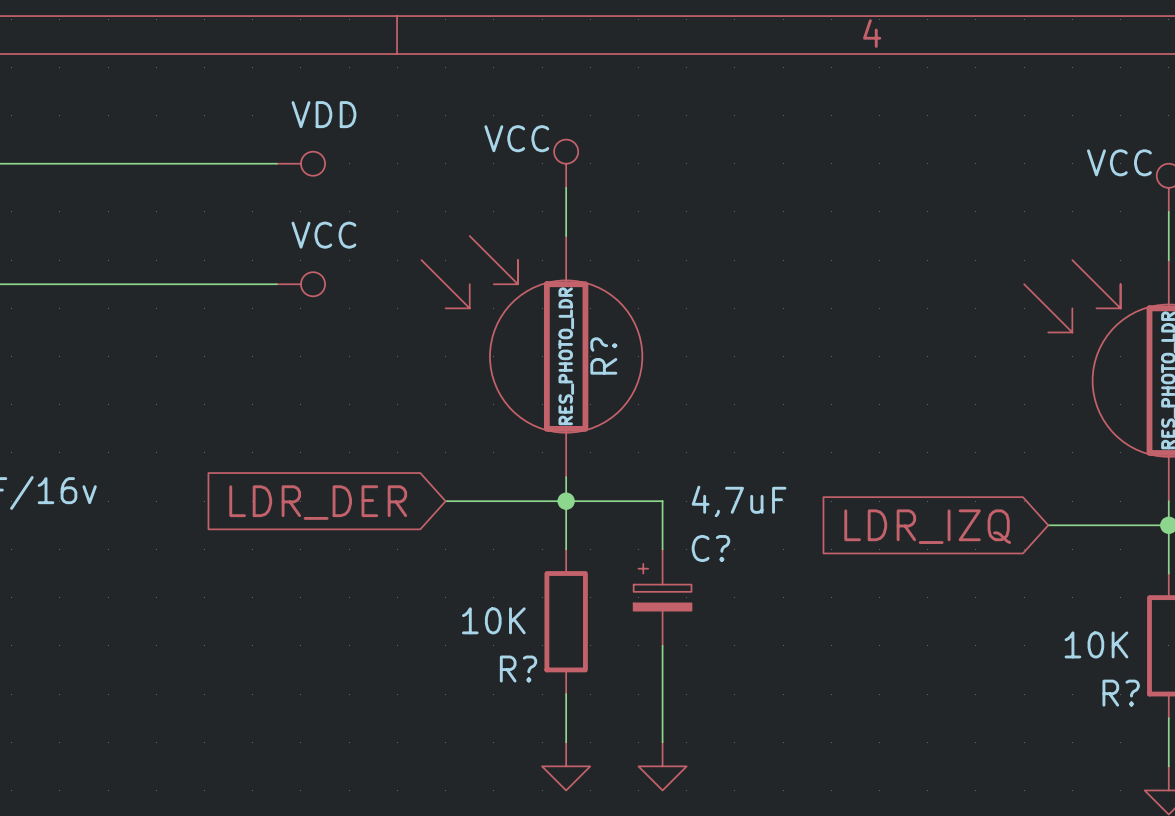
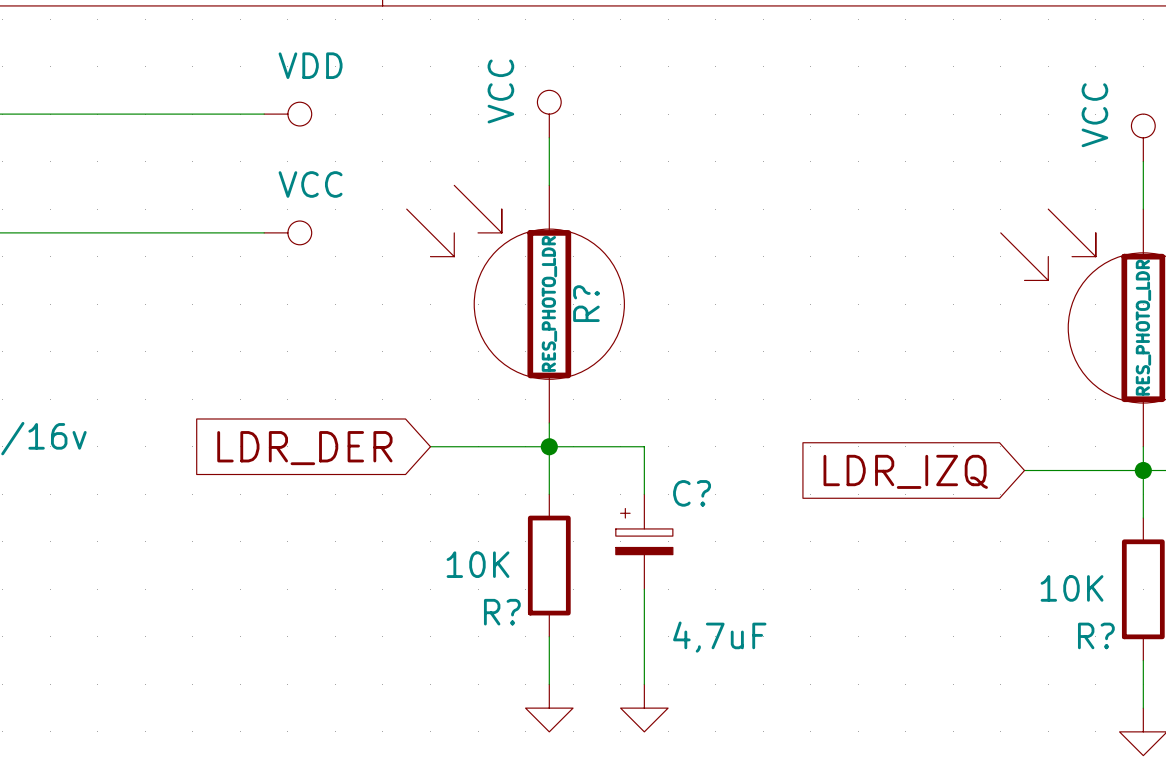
power symbol text rotation: 0° (516, 138) -> 90° counterclockwise (500, 91)
power symbol text rotation: 0° (1119, 162) -> 90° counterclockwise (1094, 115)
C? value position: 4,7uF (739, 501) -> 4,7uF (719, 637)

